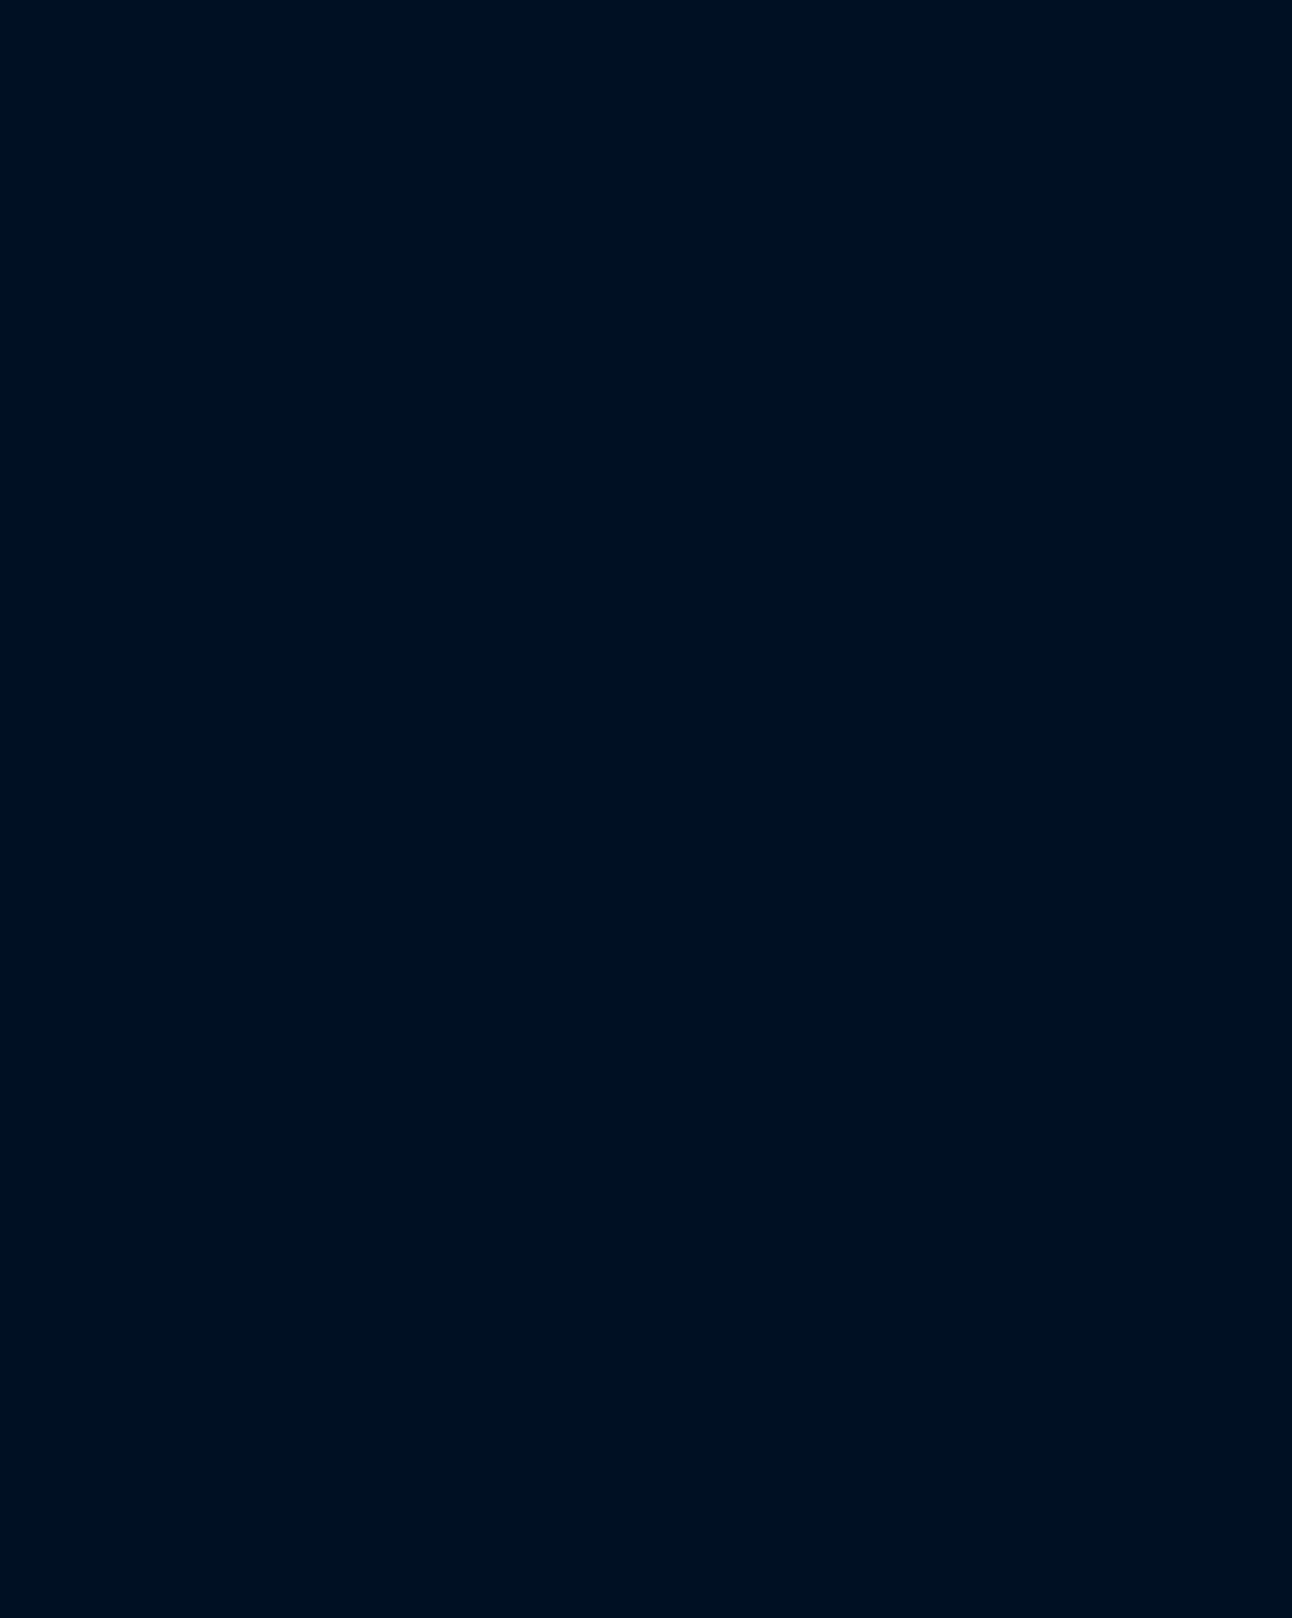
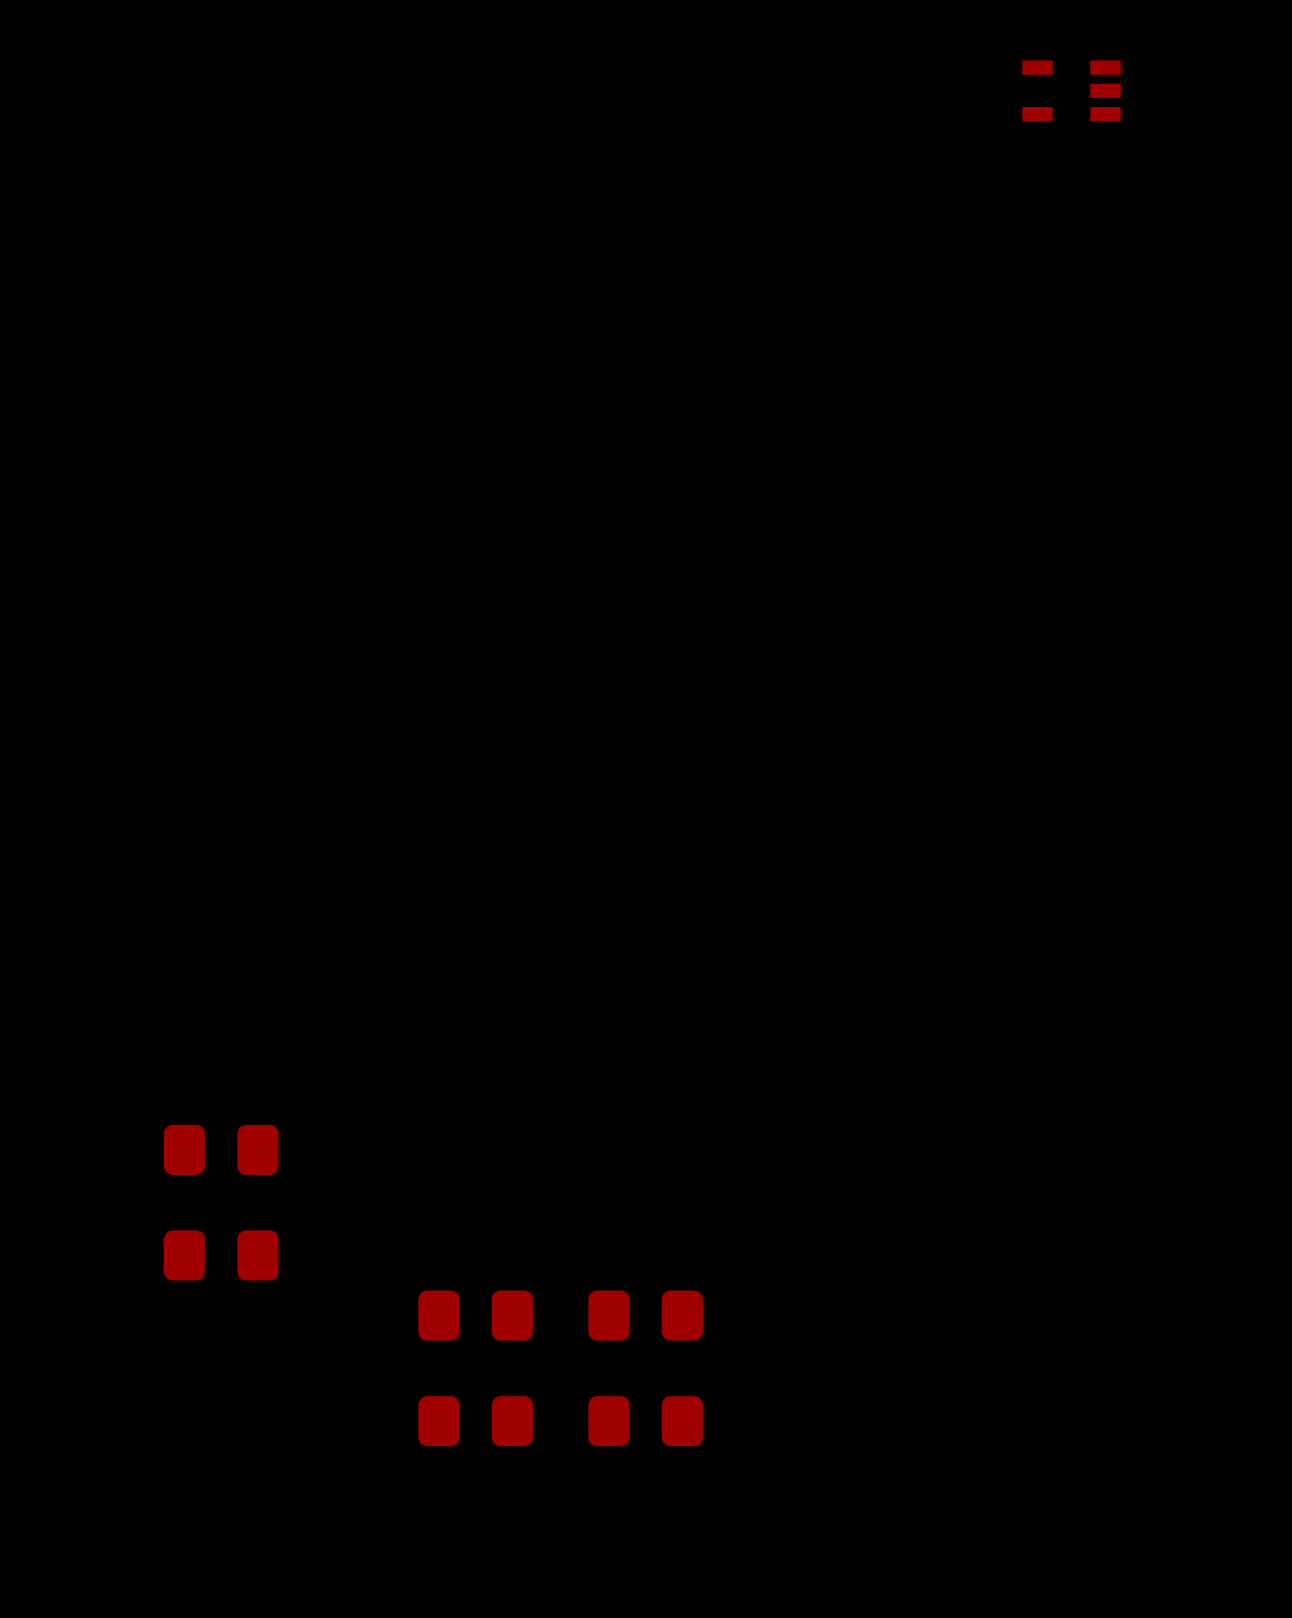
part: none -> (1071, 90)
part: none -> (221, 1149)
part: none -> (221, 1255)
part: none -> (475, 1315)
part: none -> (645, 1315)
part: none -> (475, 1421)
part: none -> (645, 1421)

